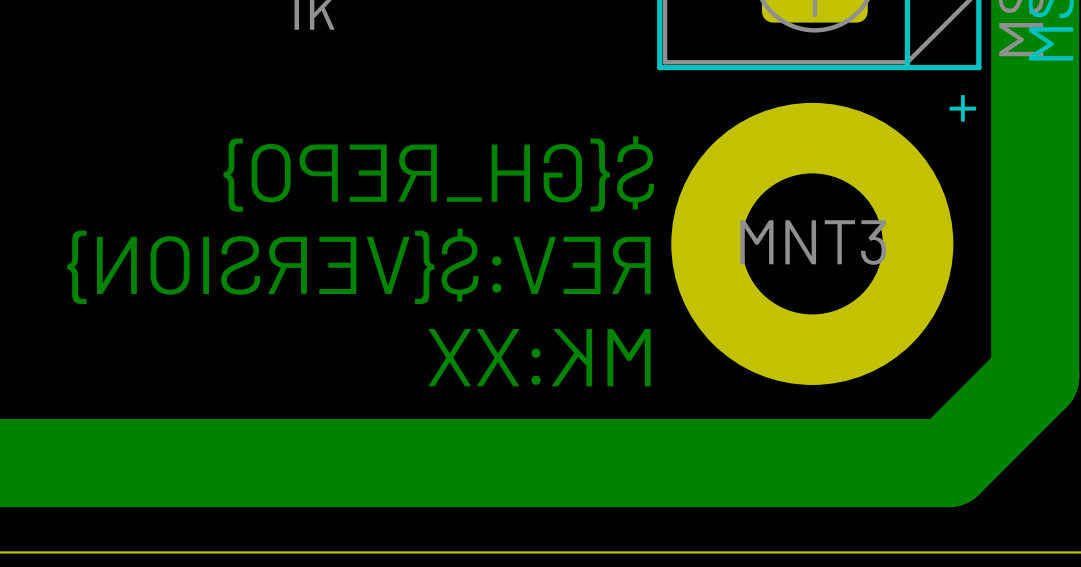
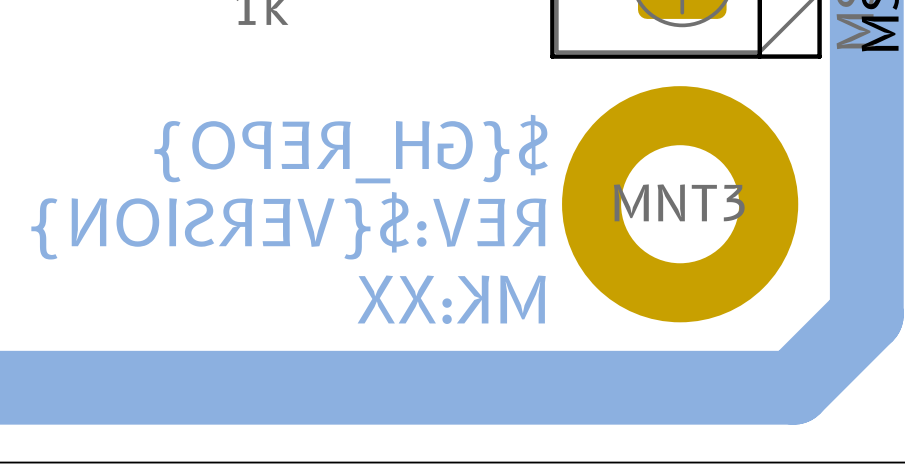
text: + (962, 108) -> none

